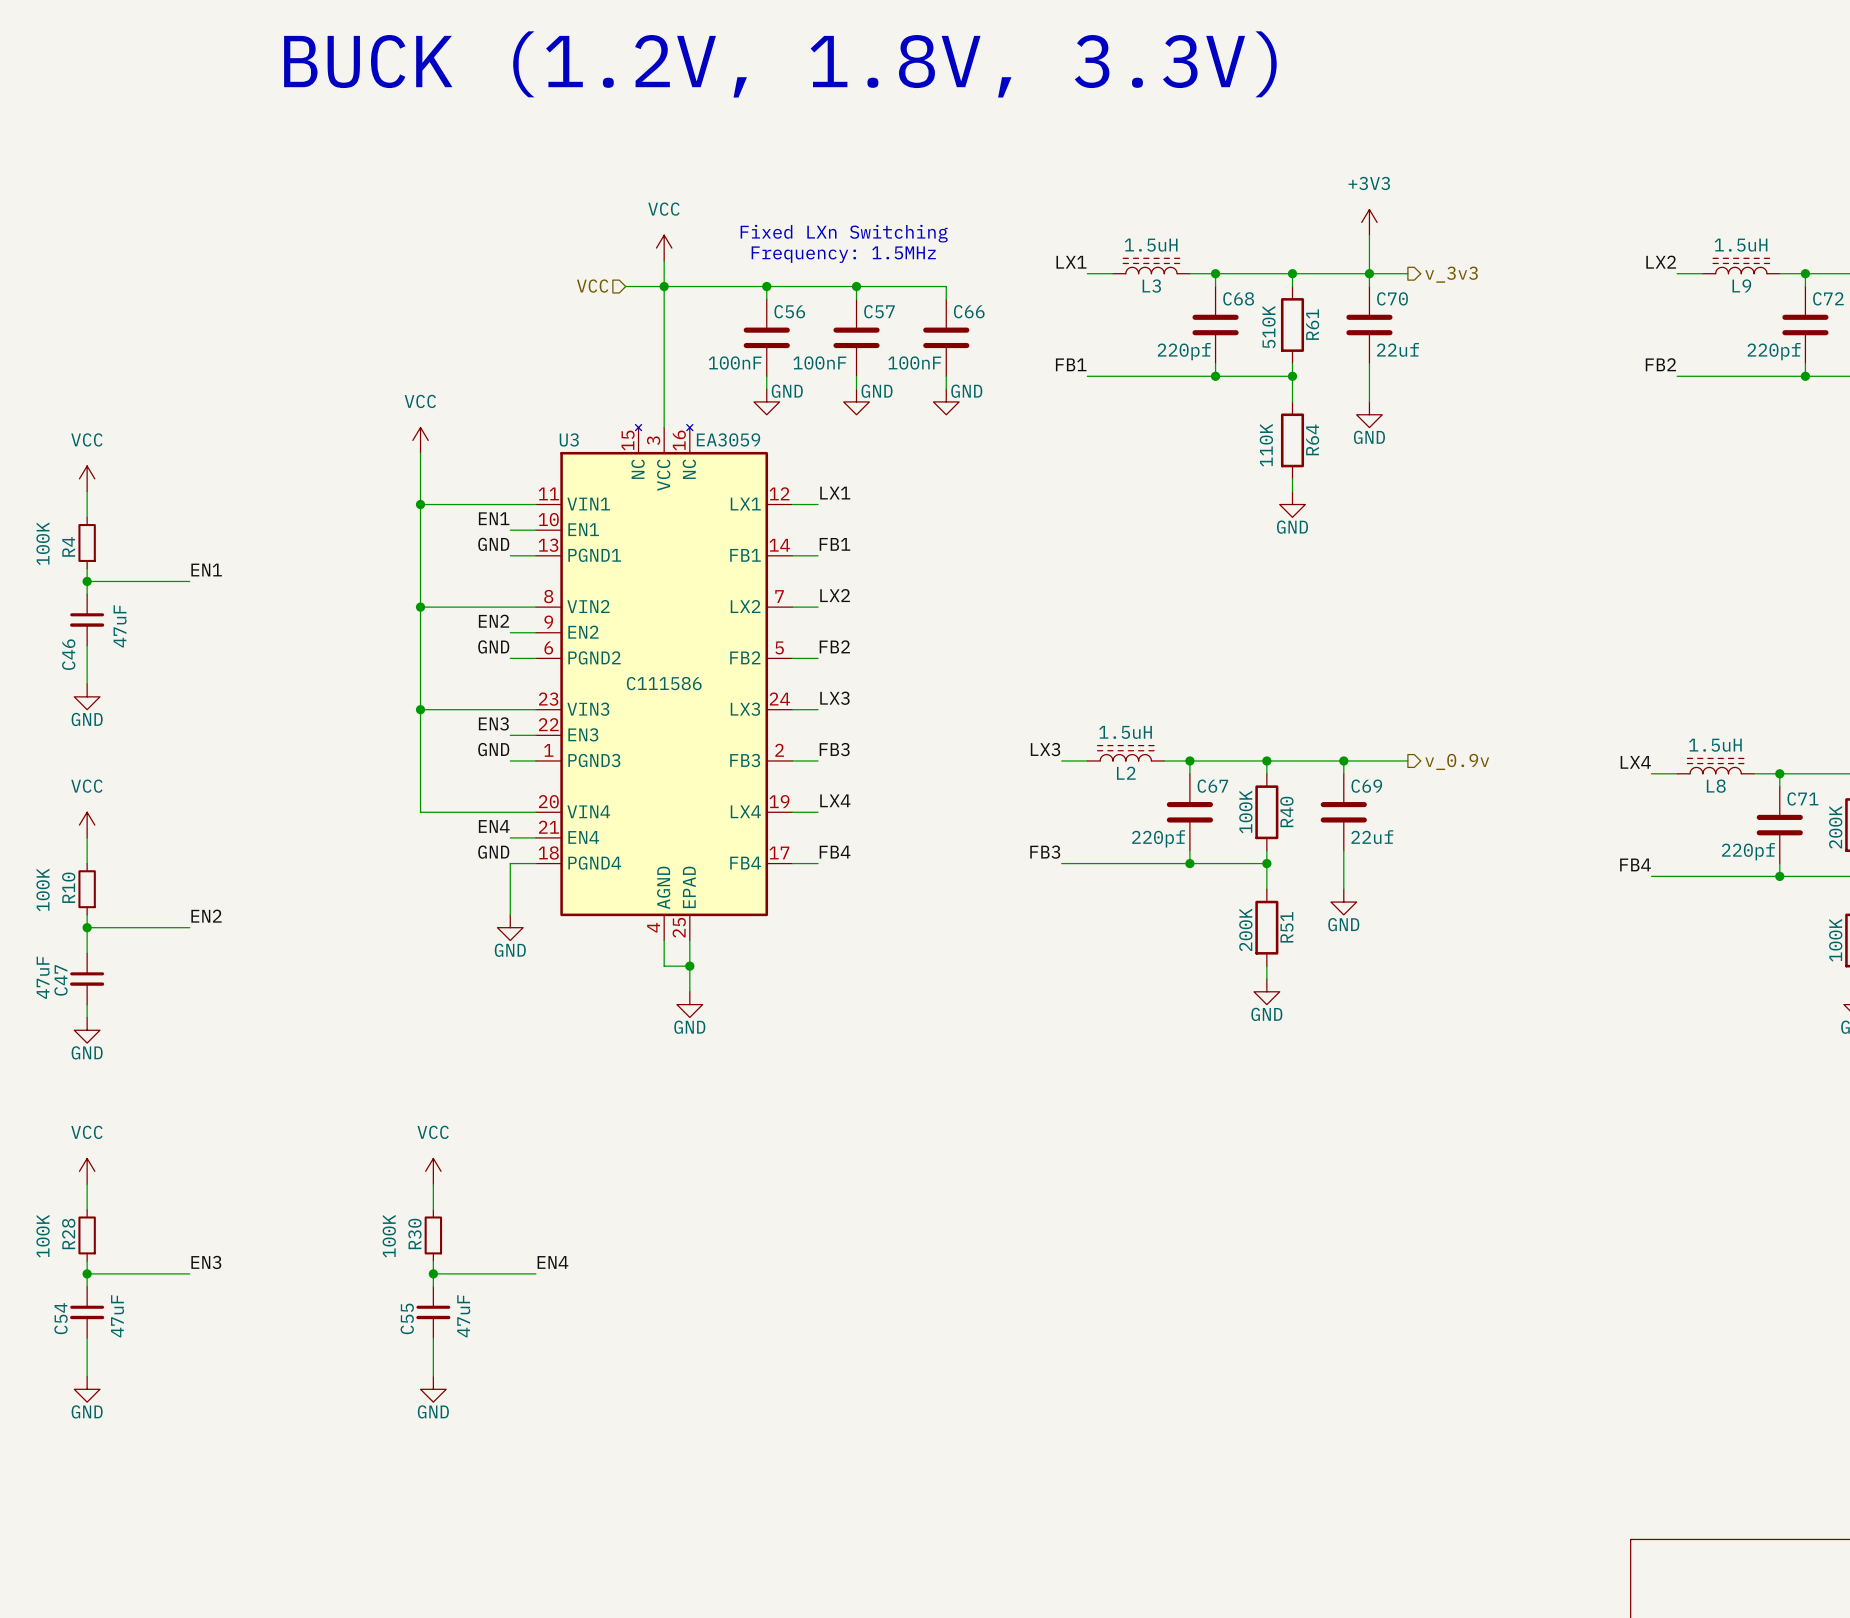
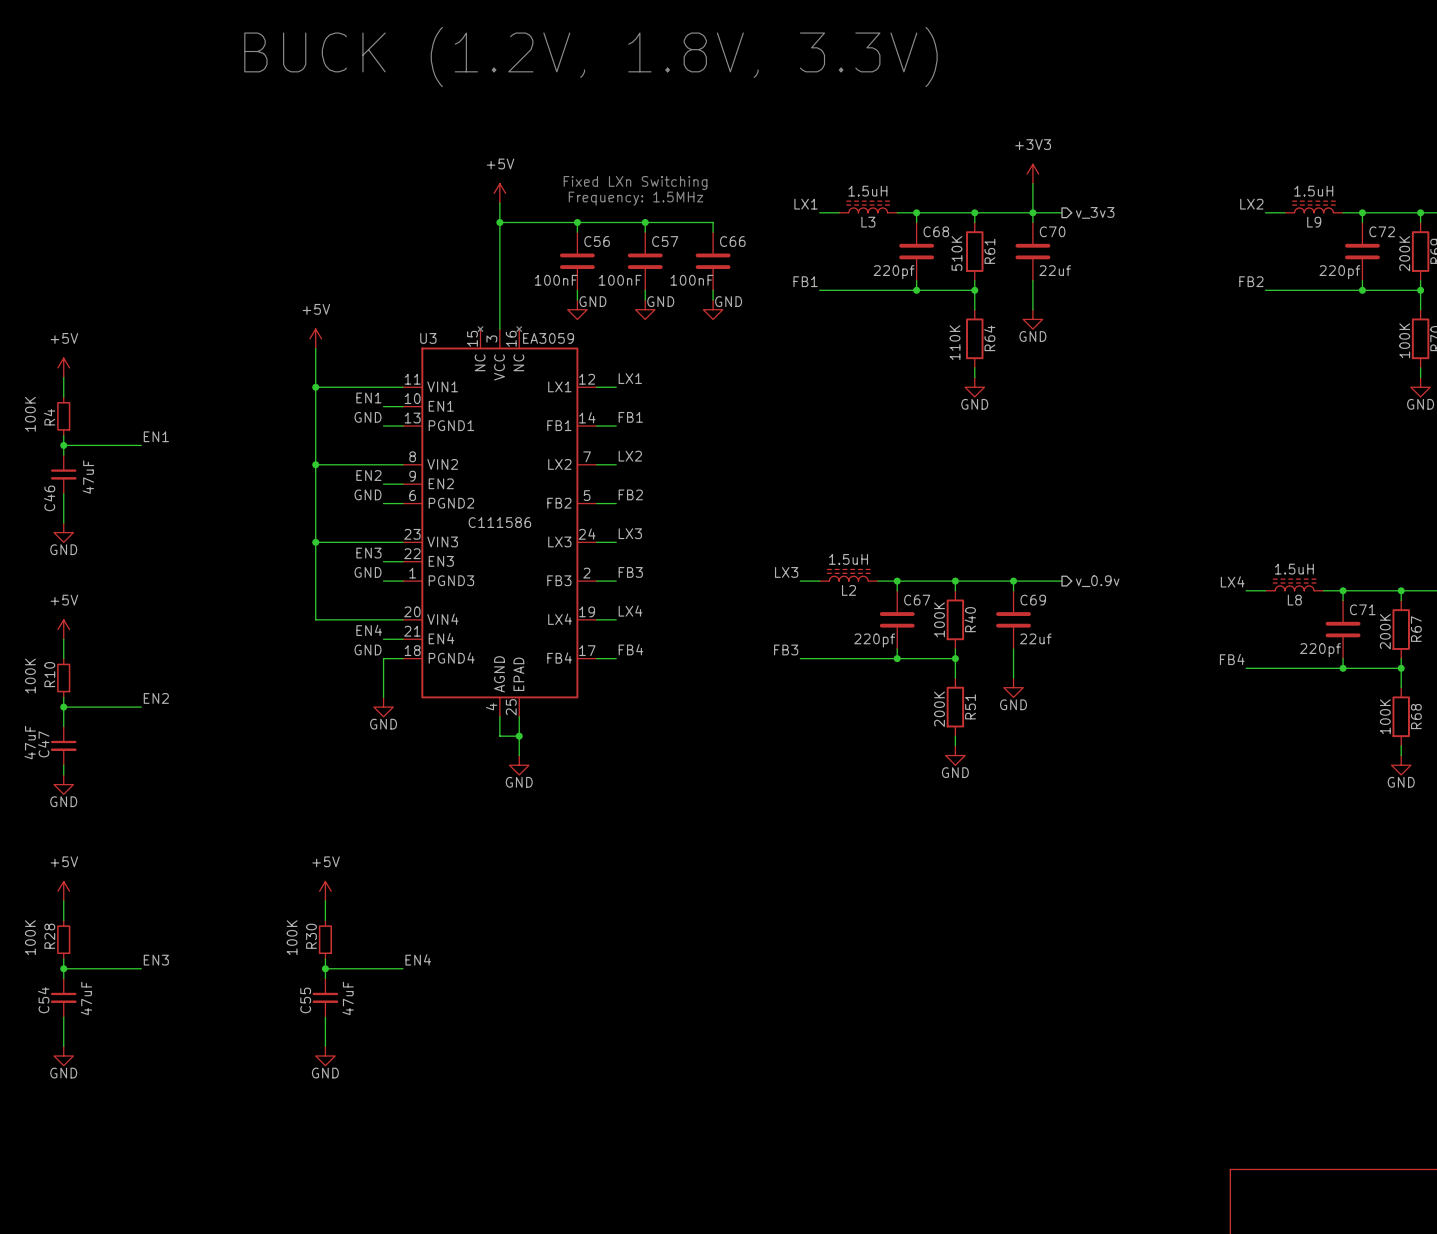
power symbol: VCC (664, 248) -> +5V (499, 193)
hierarchical label: VCC (592, 286) -> none
wire: (625, 286) (664, 286) -> none
power symbol: VCC (420, 440) -> +5V (315, 338)
power symbol: VCC (87, 478) -> +5V (63, 367)
power symbol: VCC (87, 825) -> +5V (63, 629)
power symbol: VCC (87, 1171) -> +5V (63, 891)
power symbol: VCC (433, 1171) -> +5V (325, 891)

